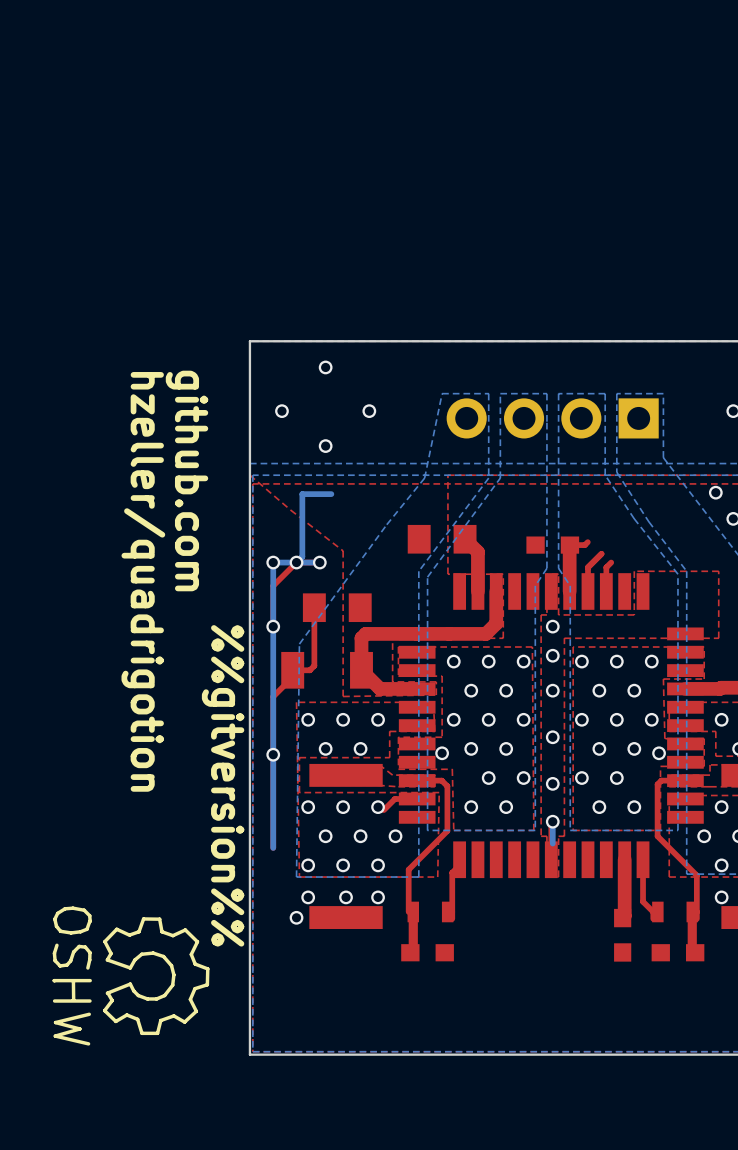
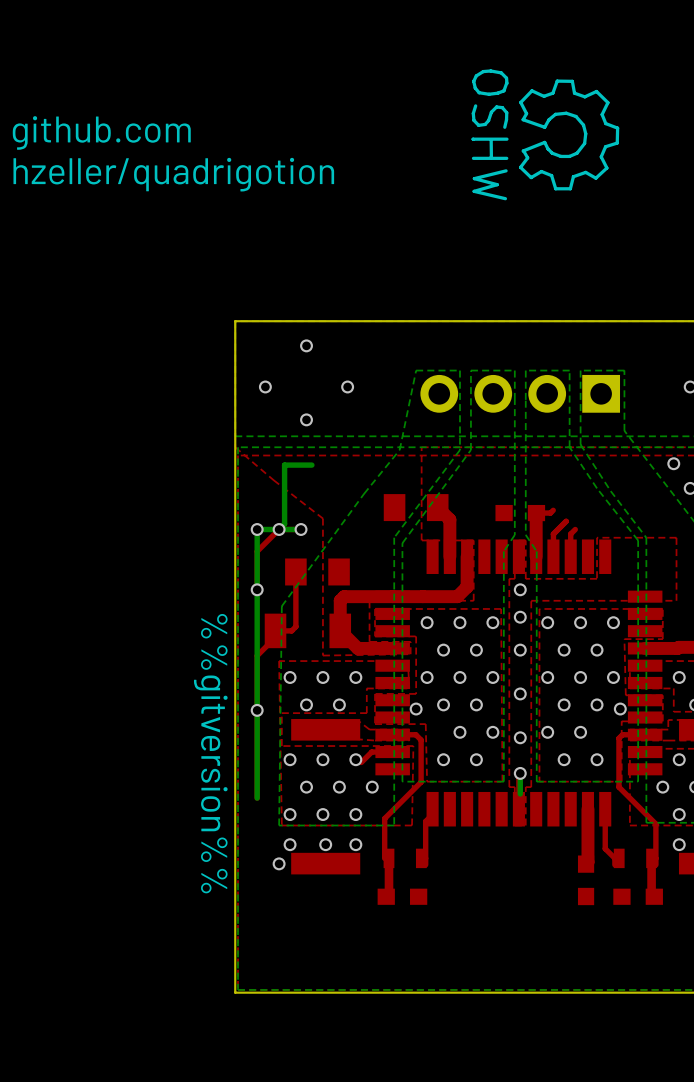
drawing: none -> [471, 69, 620, 201]
text rotation: 0° (187, 480) -> 90° counterclockwise (101, 132)
text position: github.com (187, 480) -> github.com (101, 132)
text rotation: 0° (143, 581) -> 90° counterclockwise (173, 174)
drawing: [52, 906, 210, 1046] -> none

